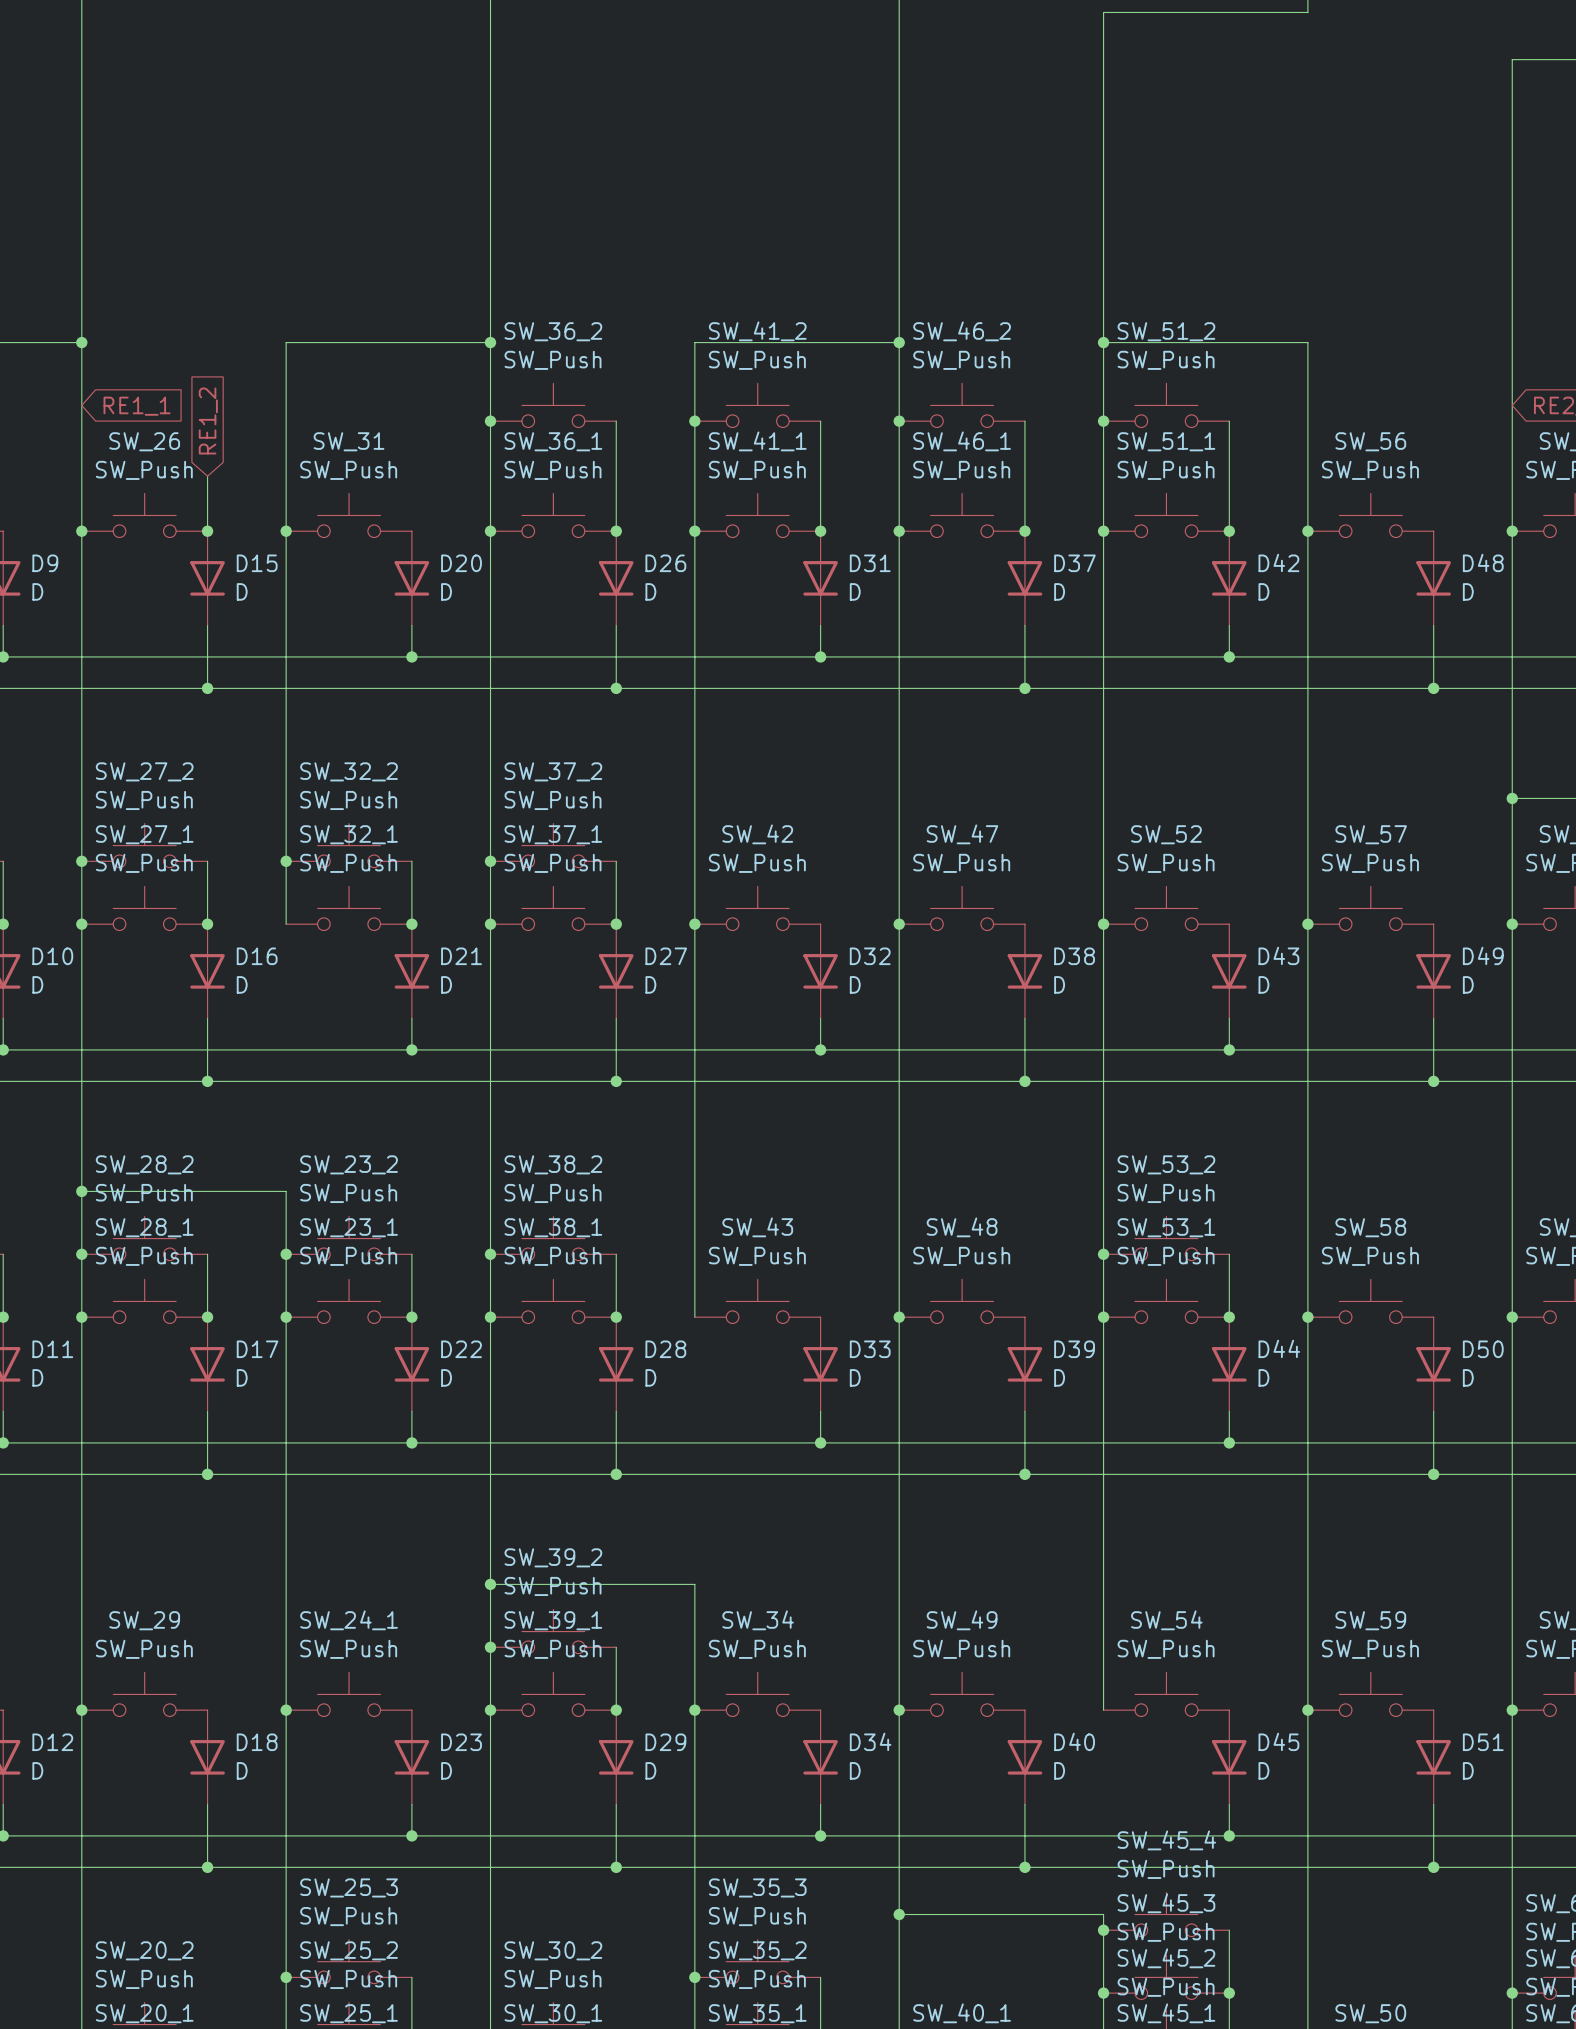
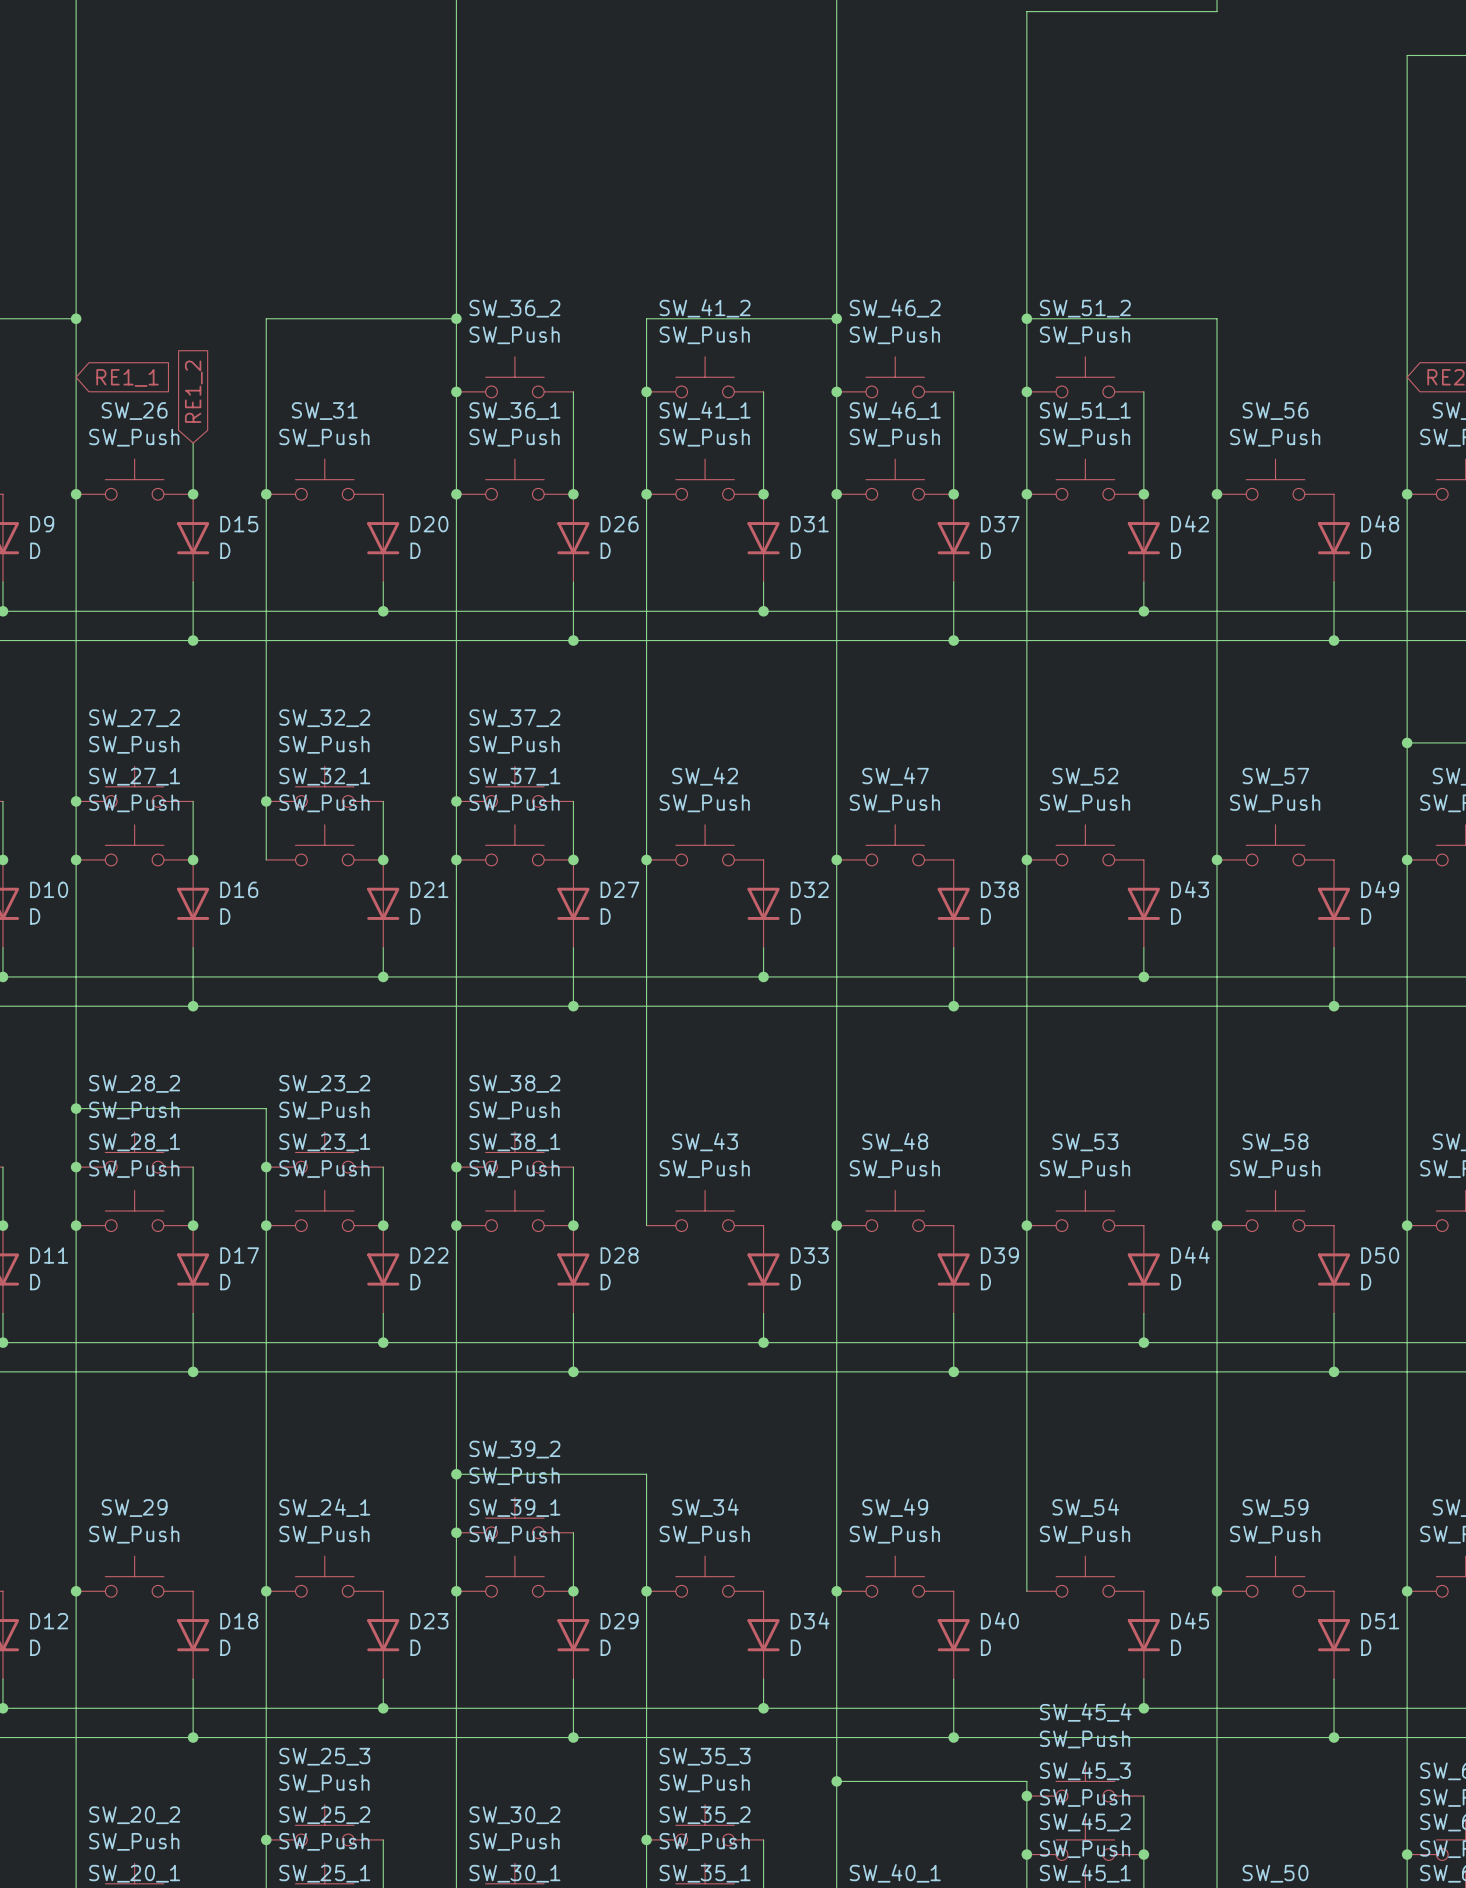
SW_53_1 name: SW_53_1 (1166, 1227) -> SW_53 (1085, 1142)
SW_53_2: SW_Push (1166, 1238) -> none
junction: (1103, 1254) -> none
wire: (1229, 1254) (1229, 1317) -> none
junction: (1229, 1317) -> none

